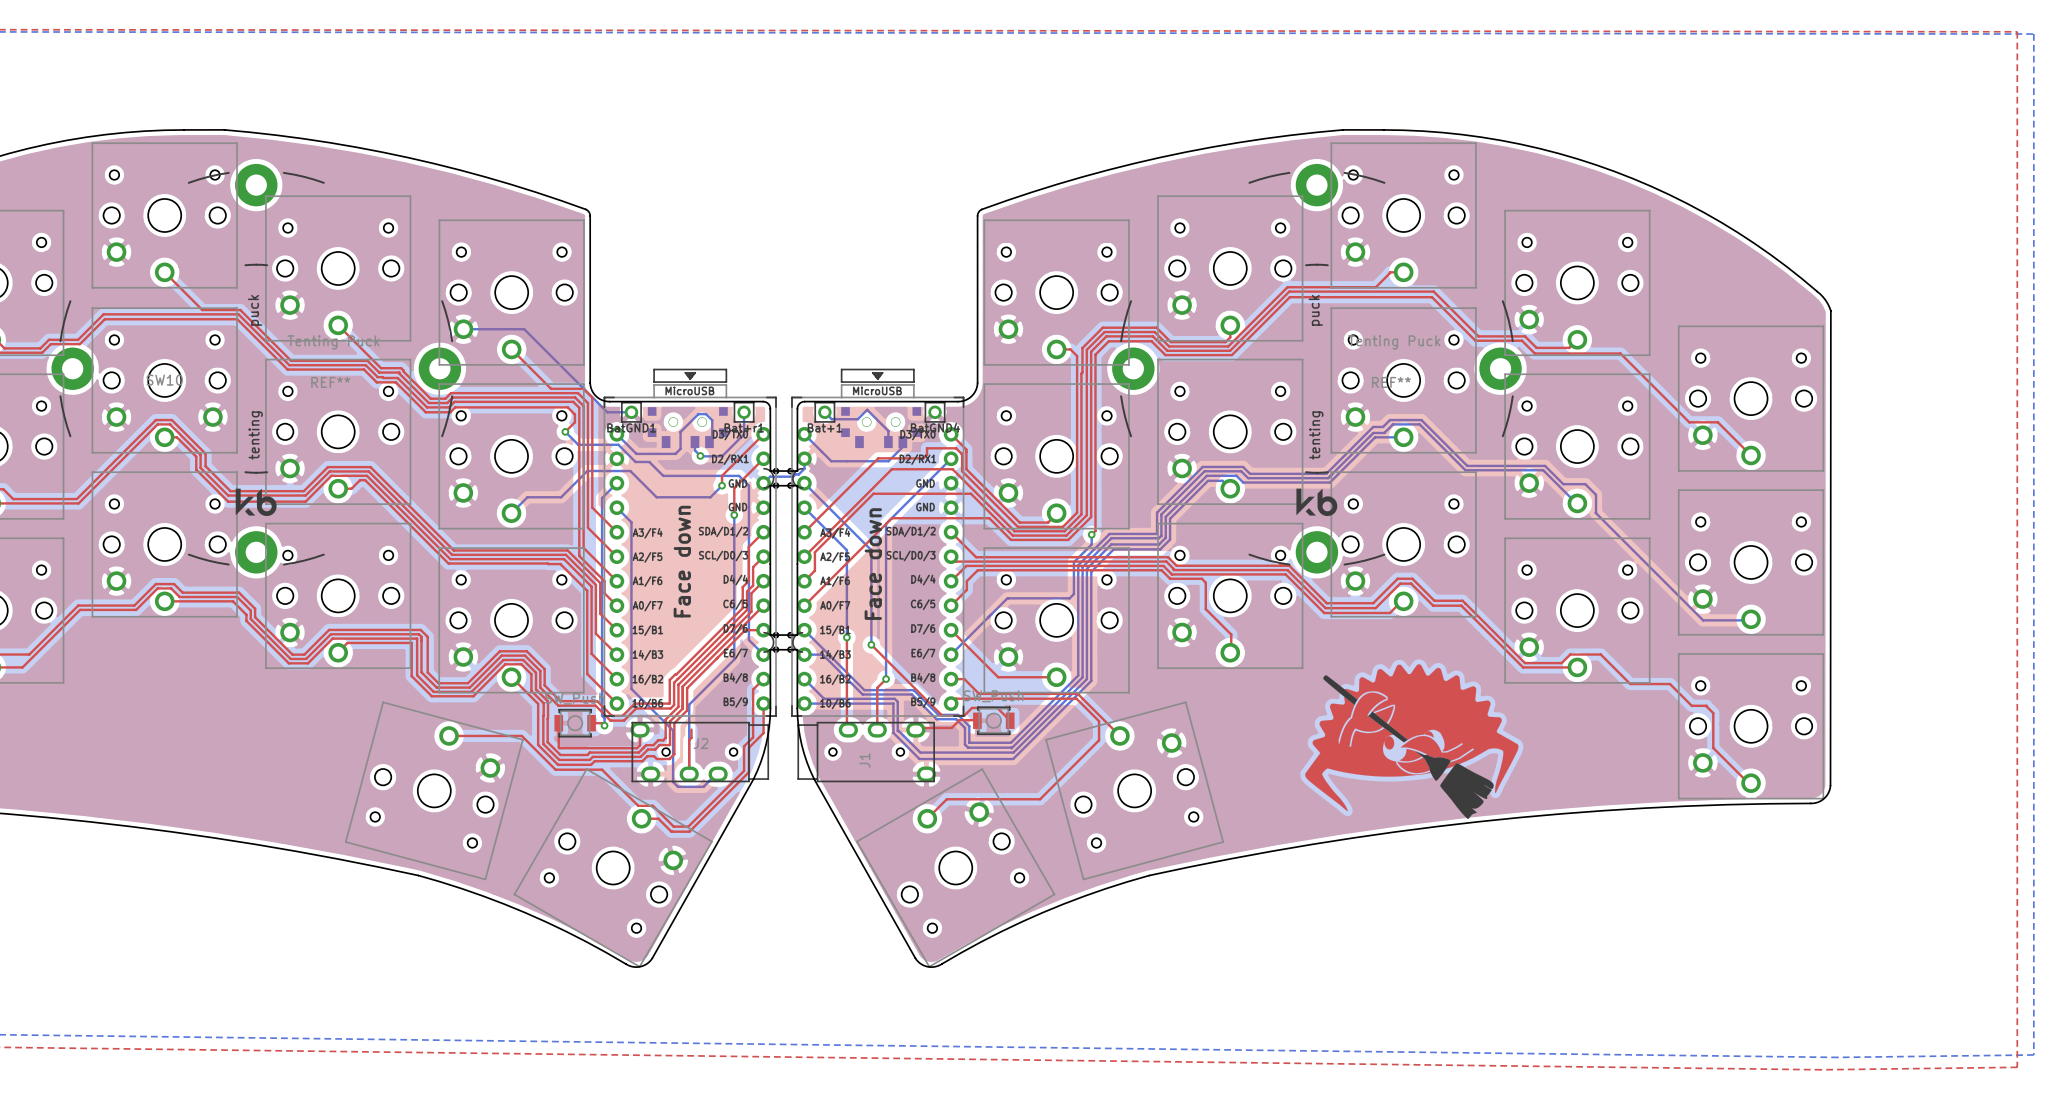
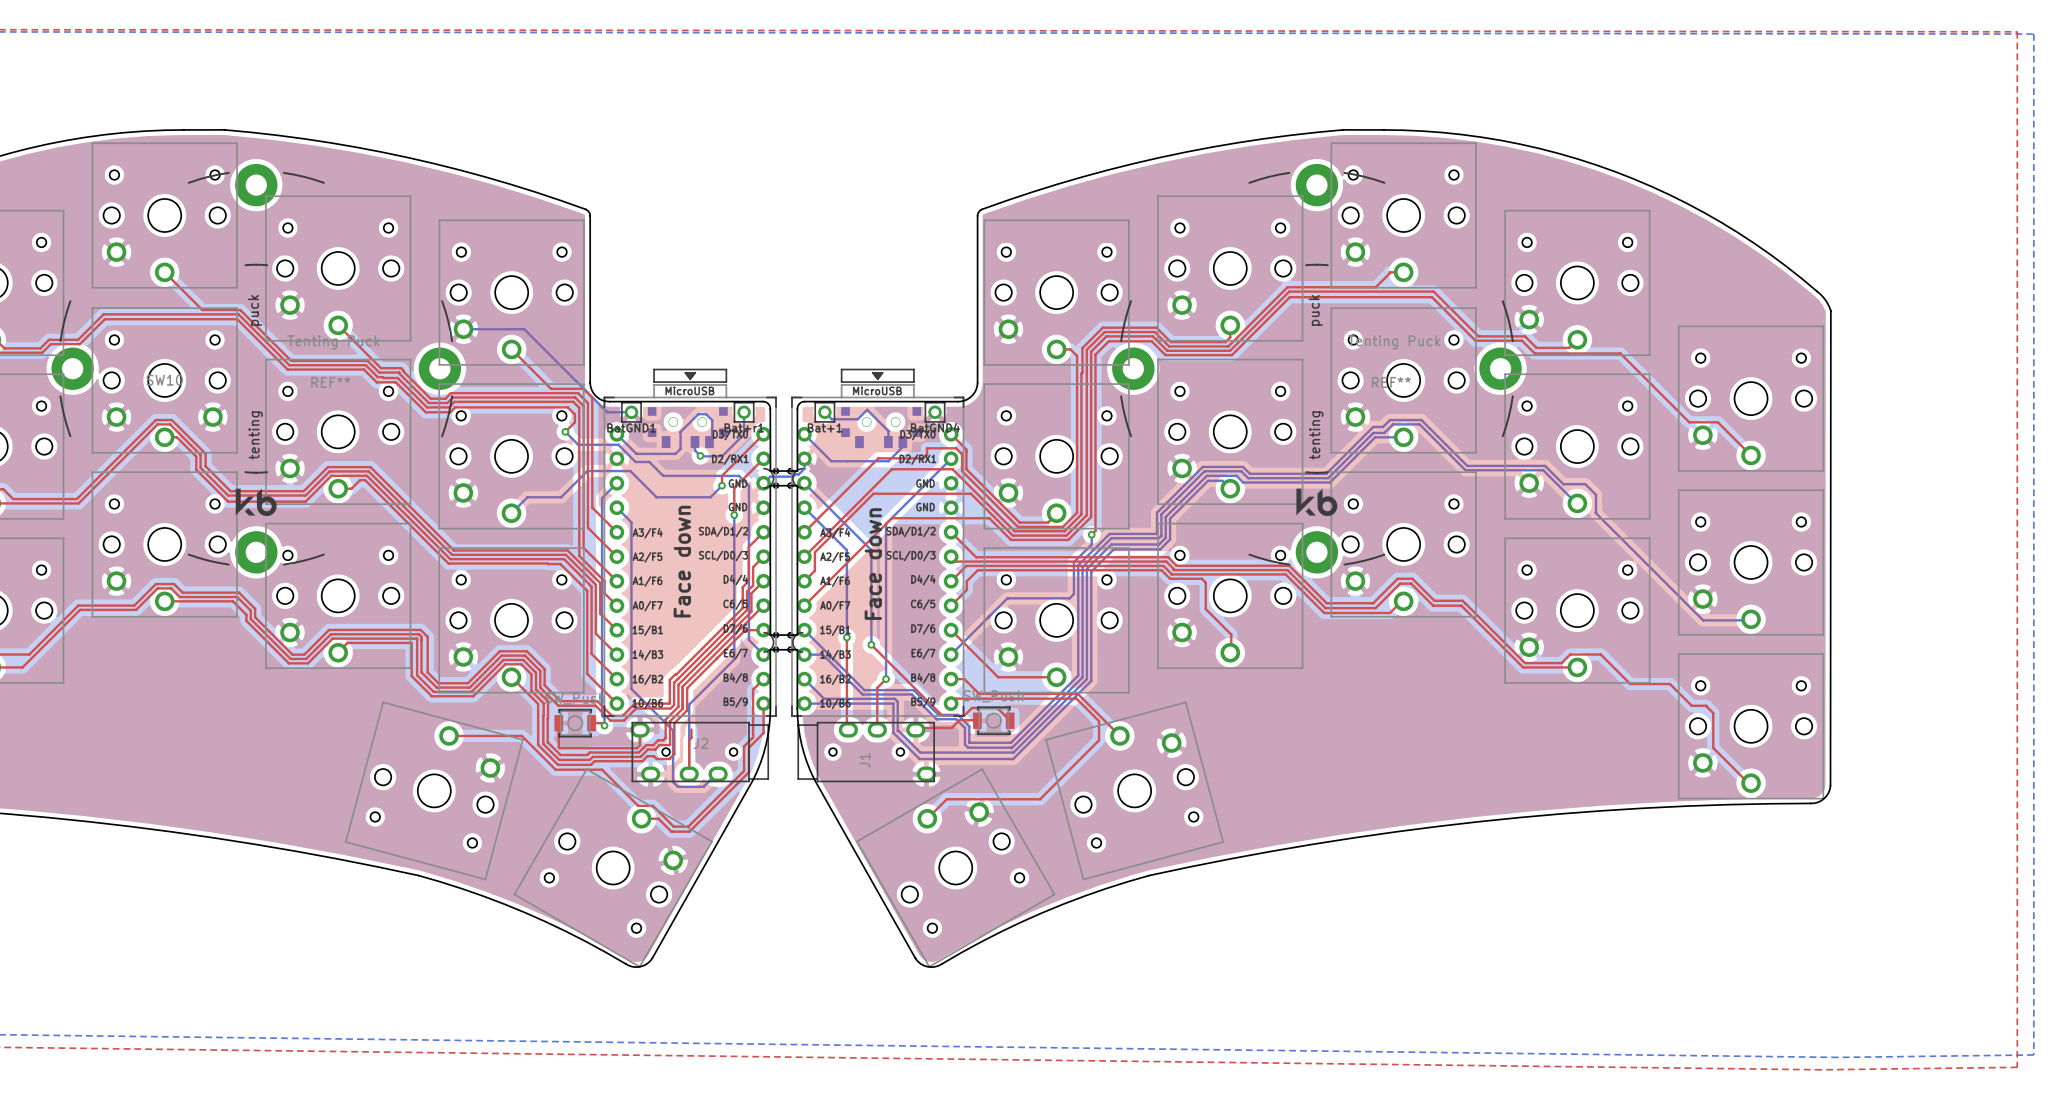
drawing: [1305, 664, 1519, 819] -> none

